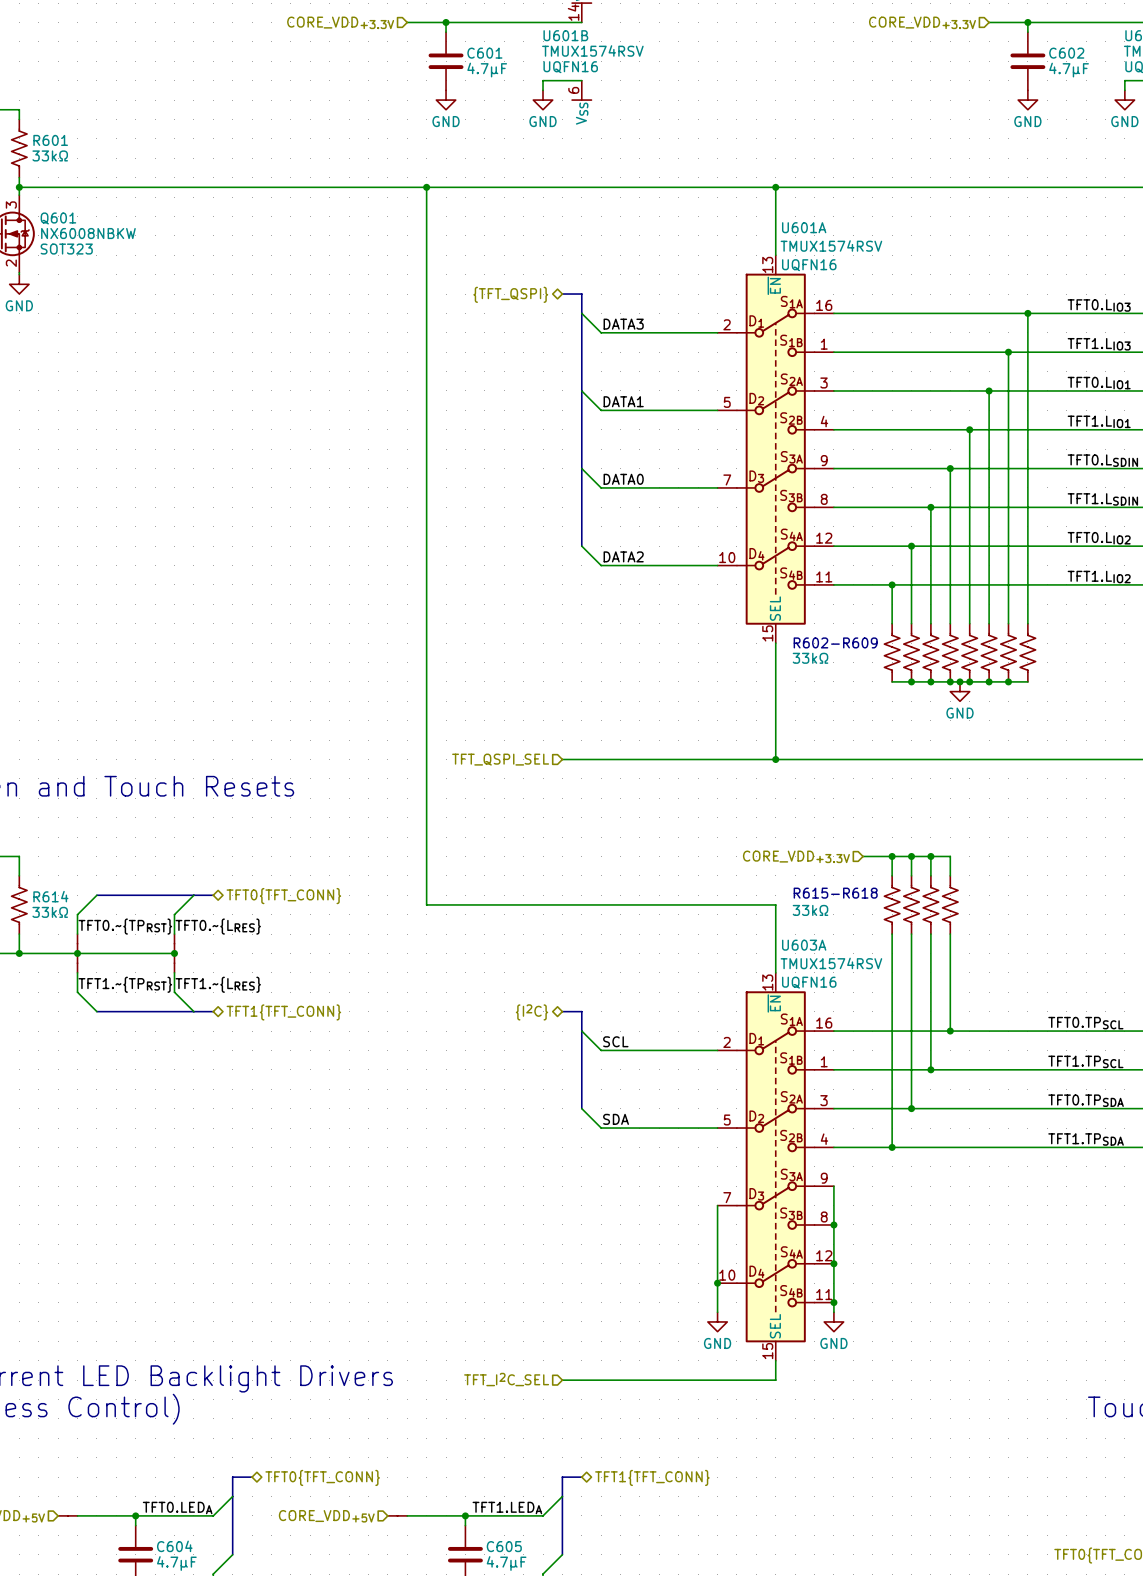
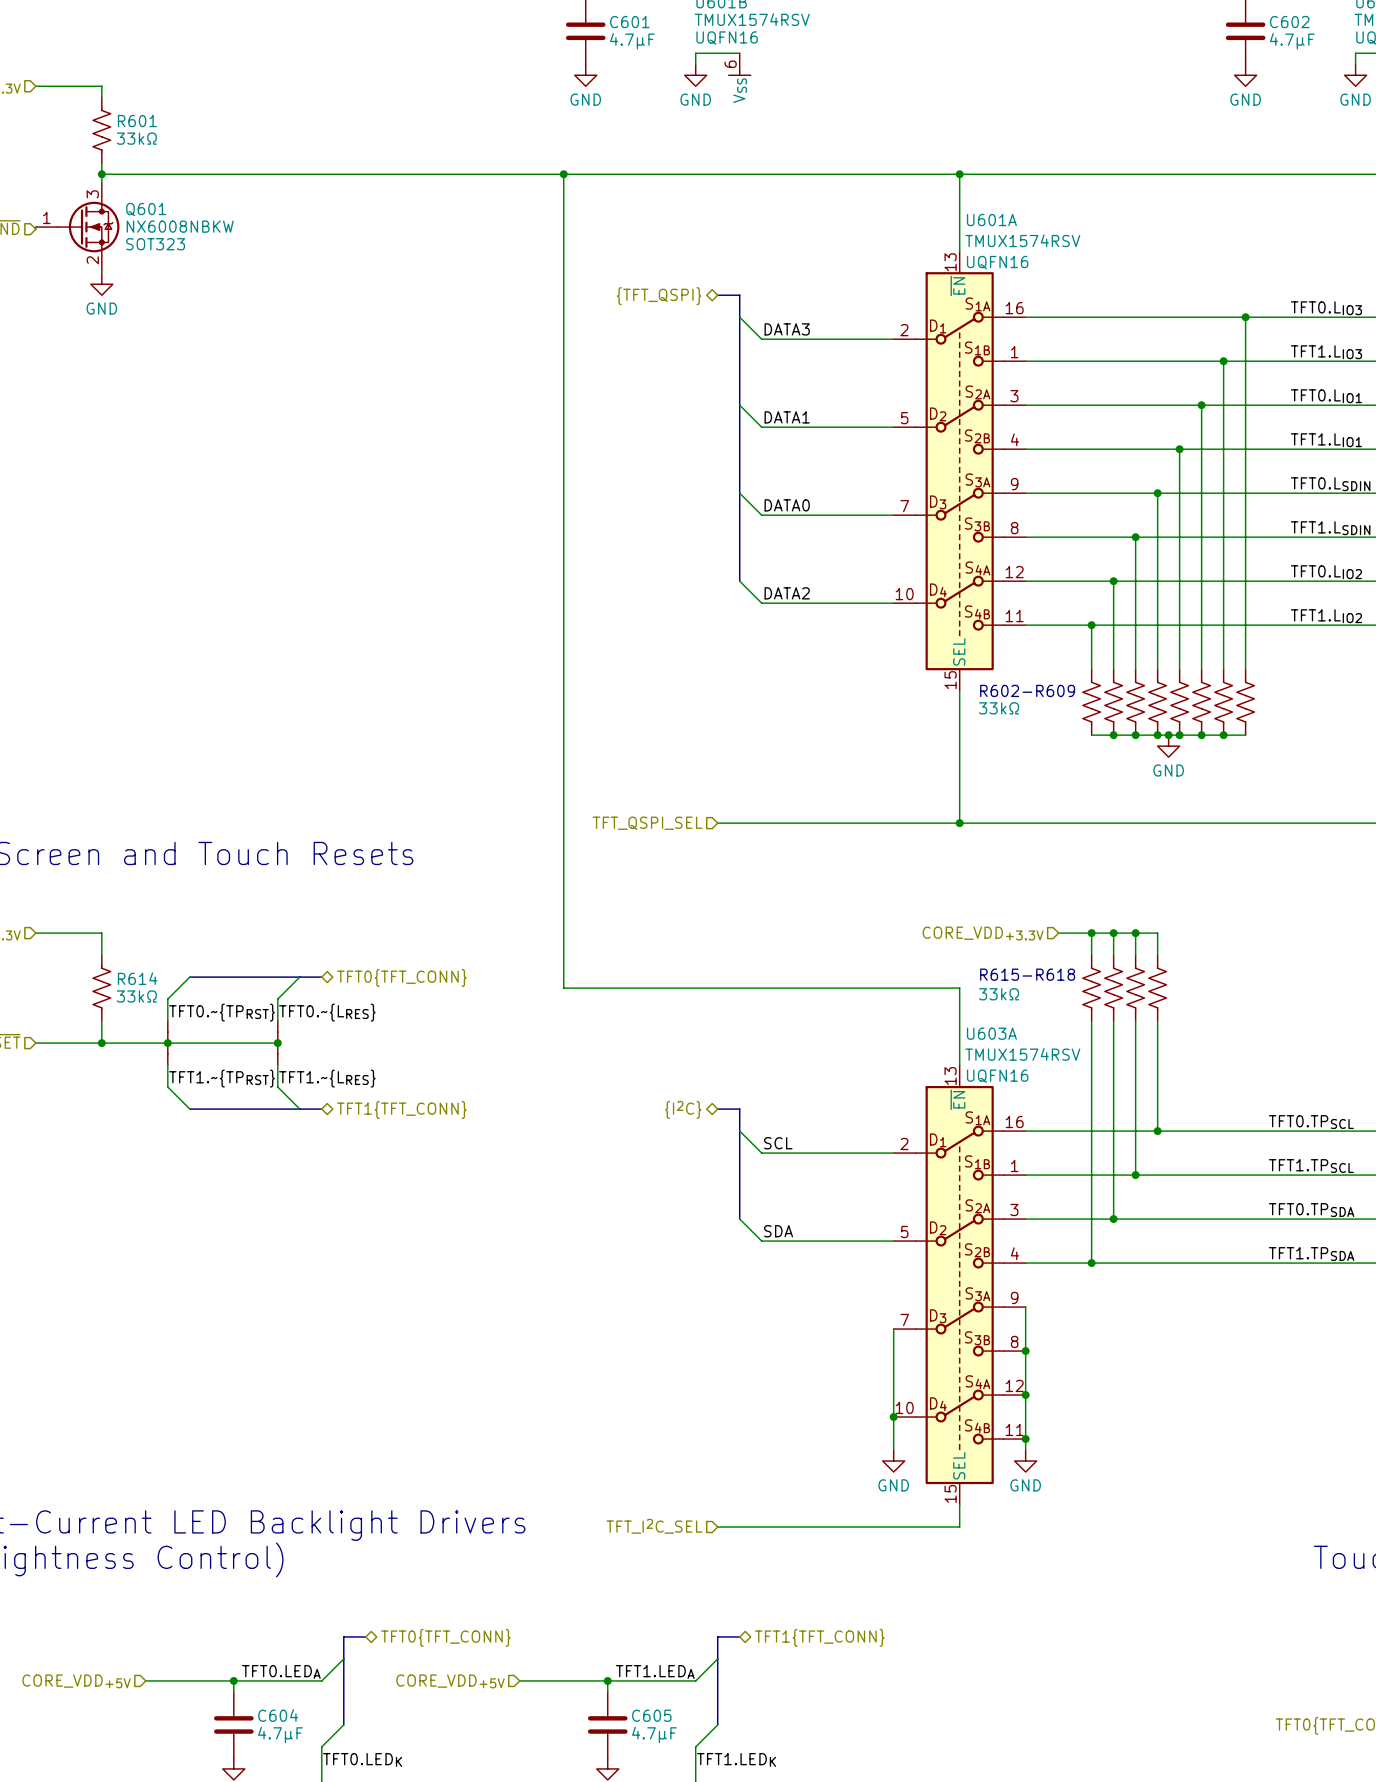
part: (67, 1515) -> none
part: (397, 1515) -> none

